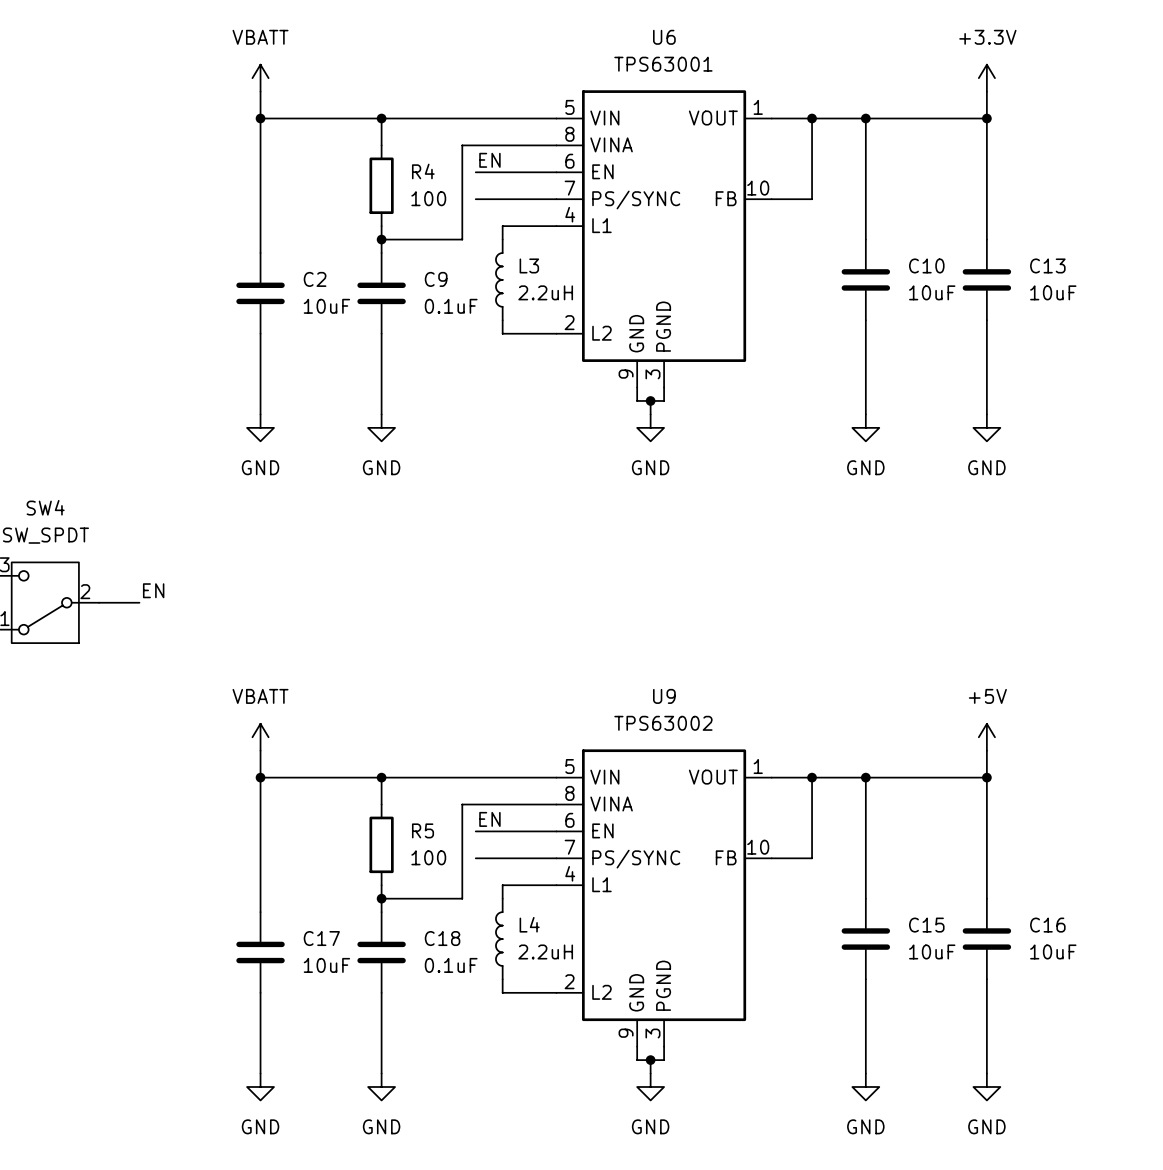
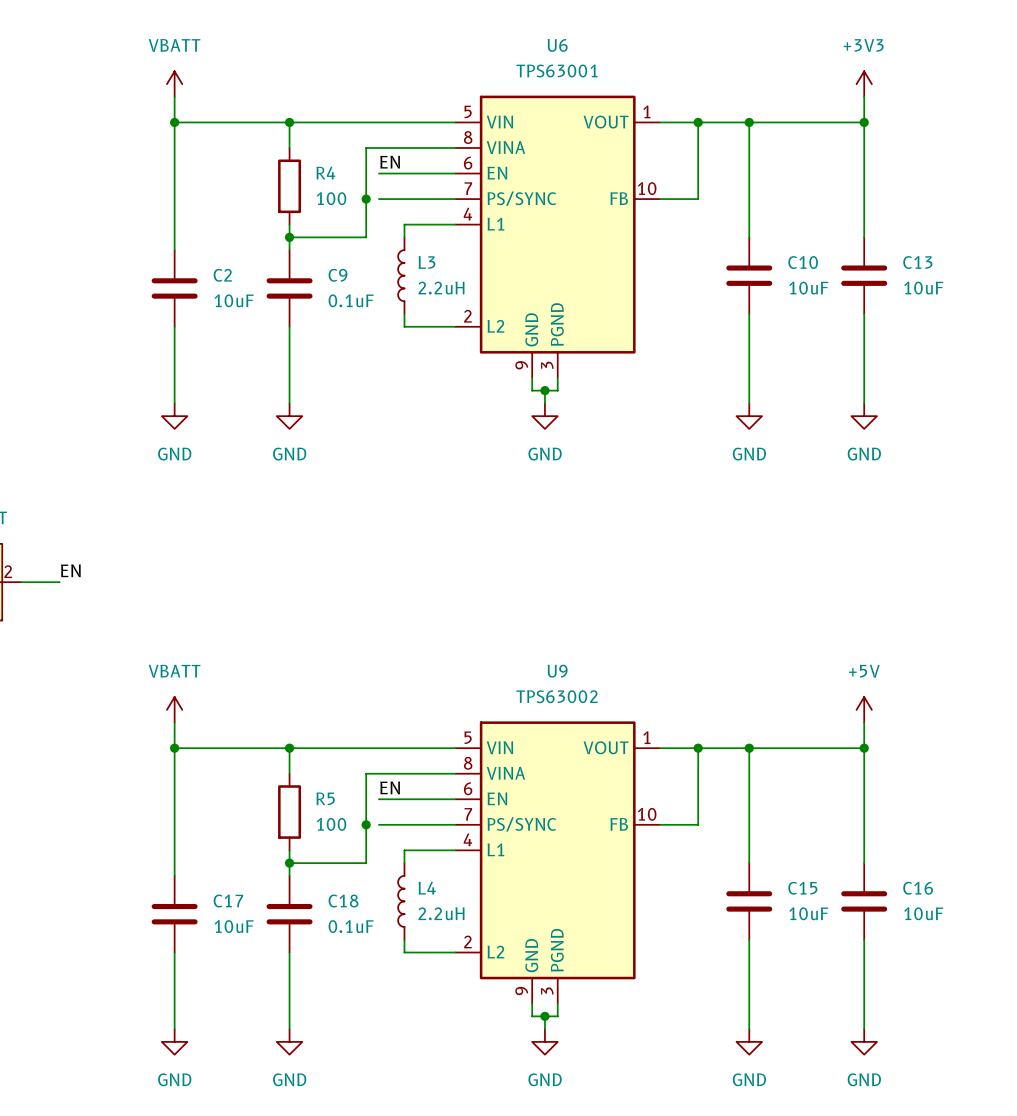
power symbol: +3.3V (986, 78) -> +3V3 (864, 84)
junction: none -> (366, 199)
junction: none -> (366, 824)

